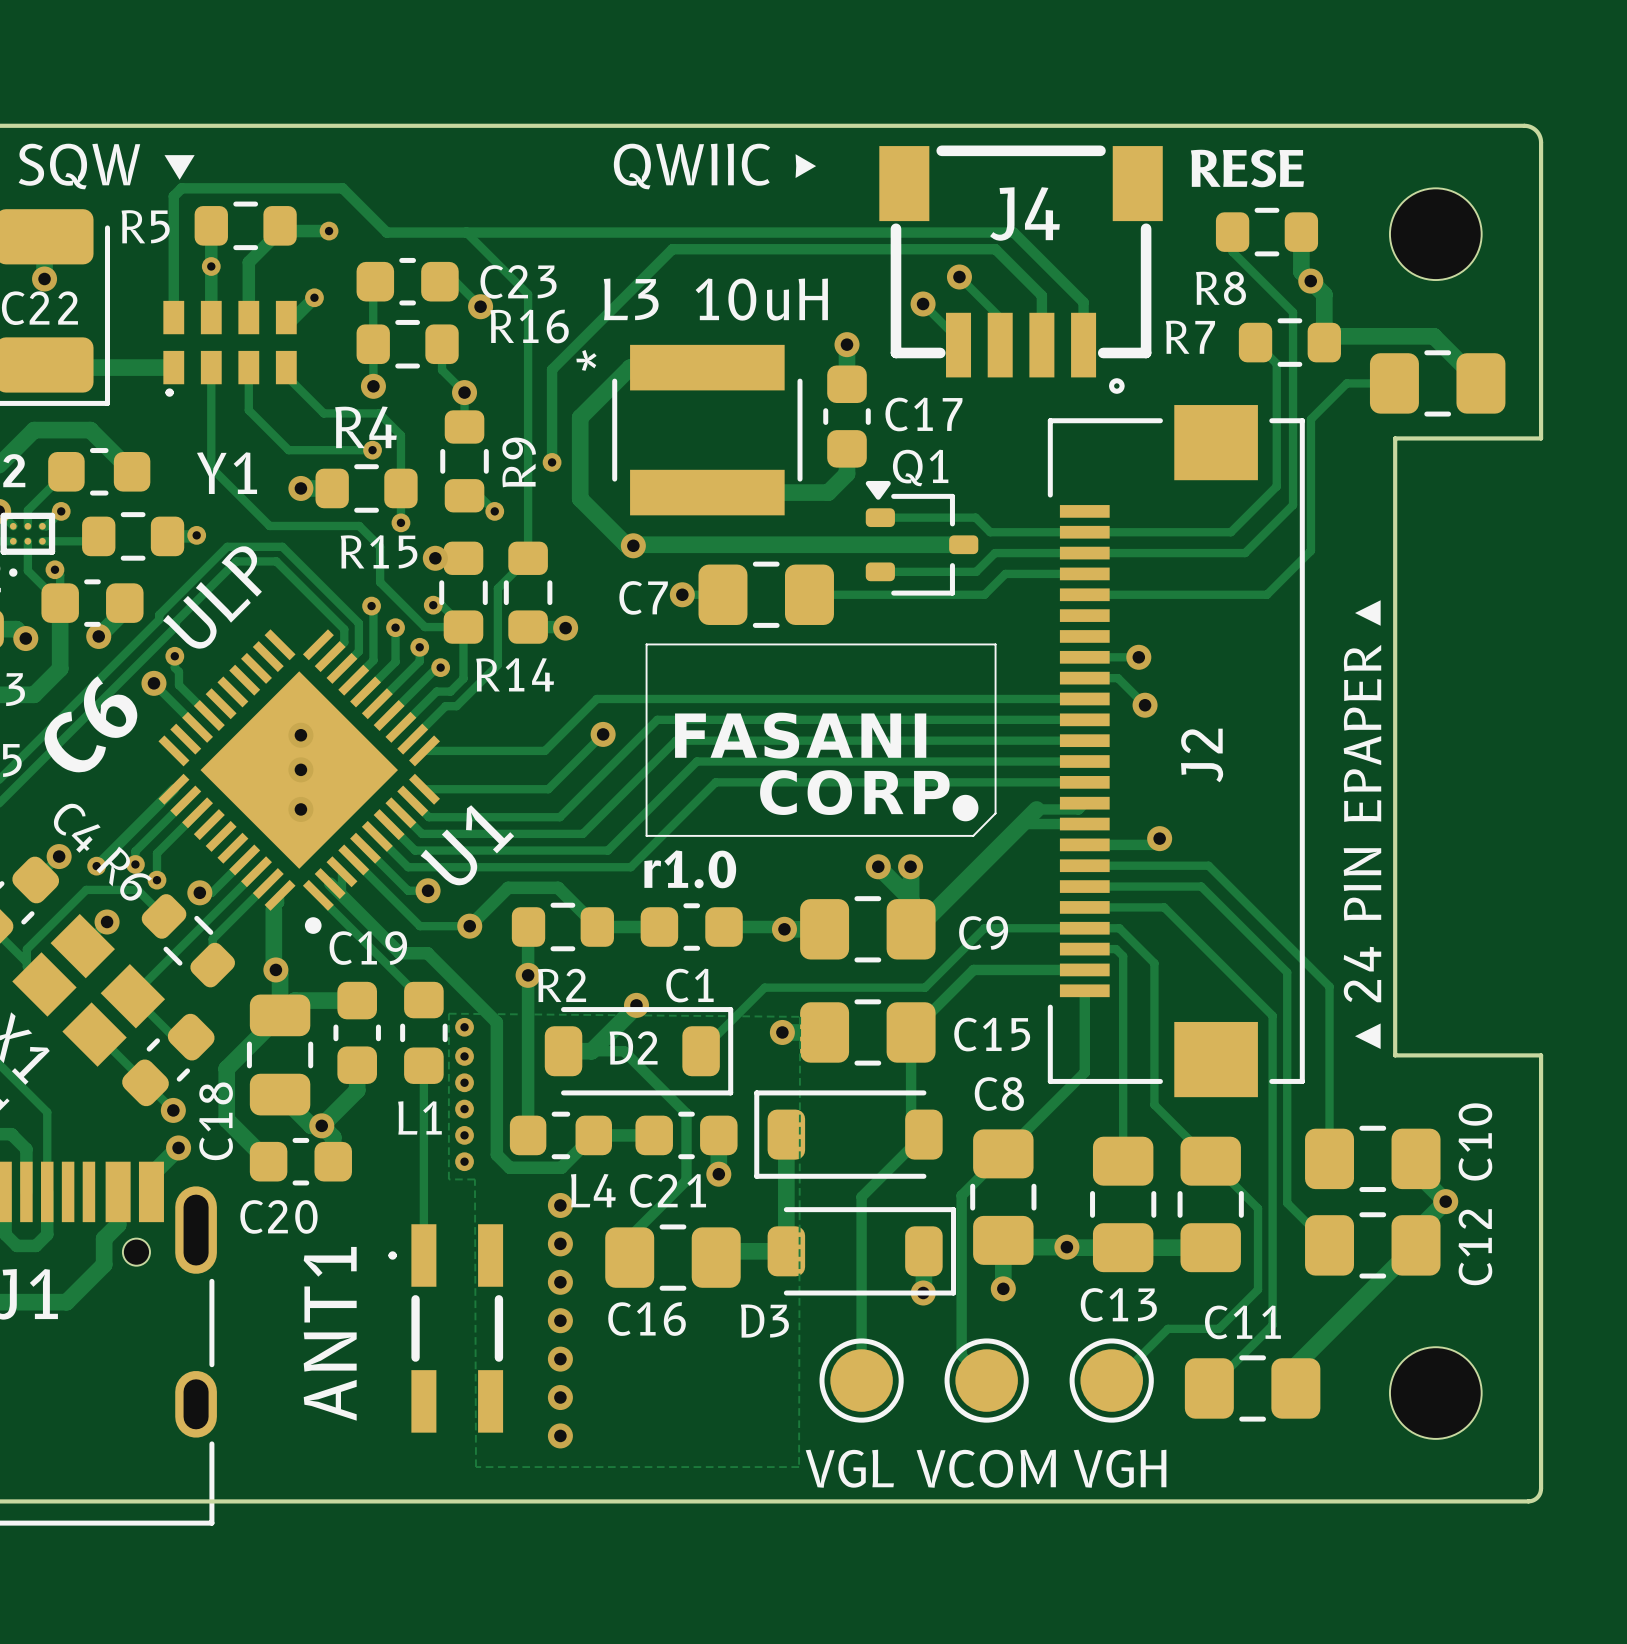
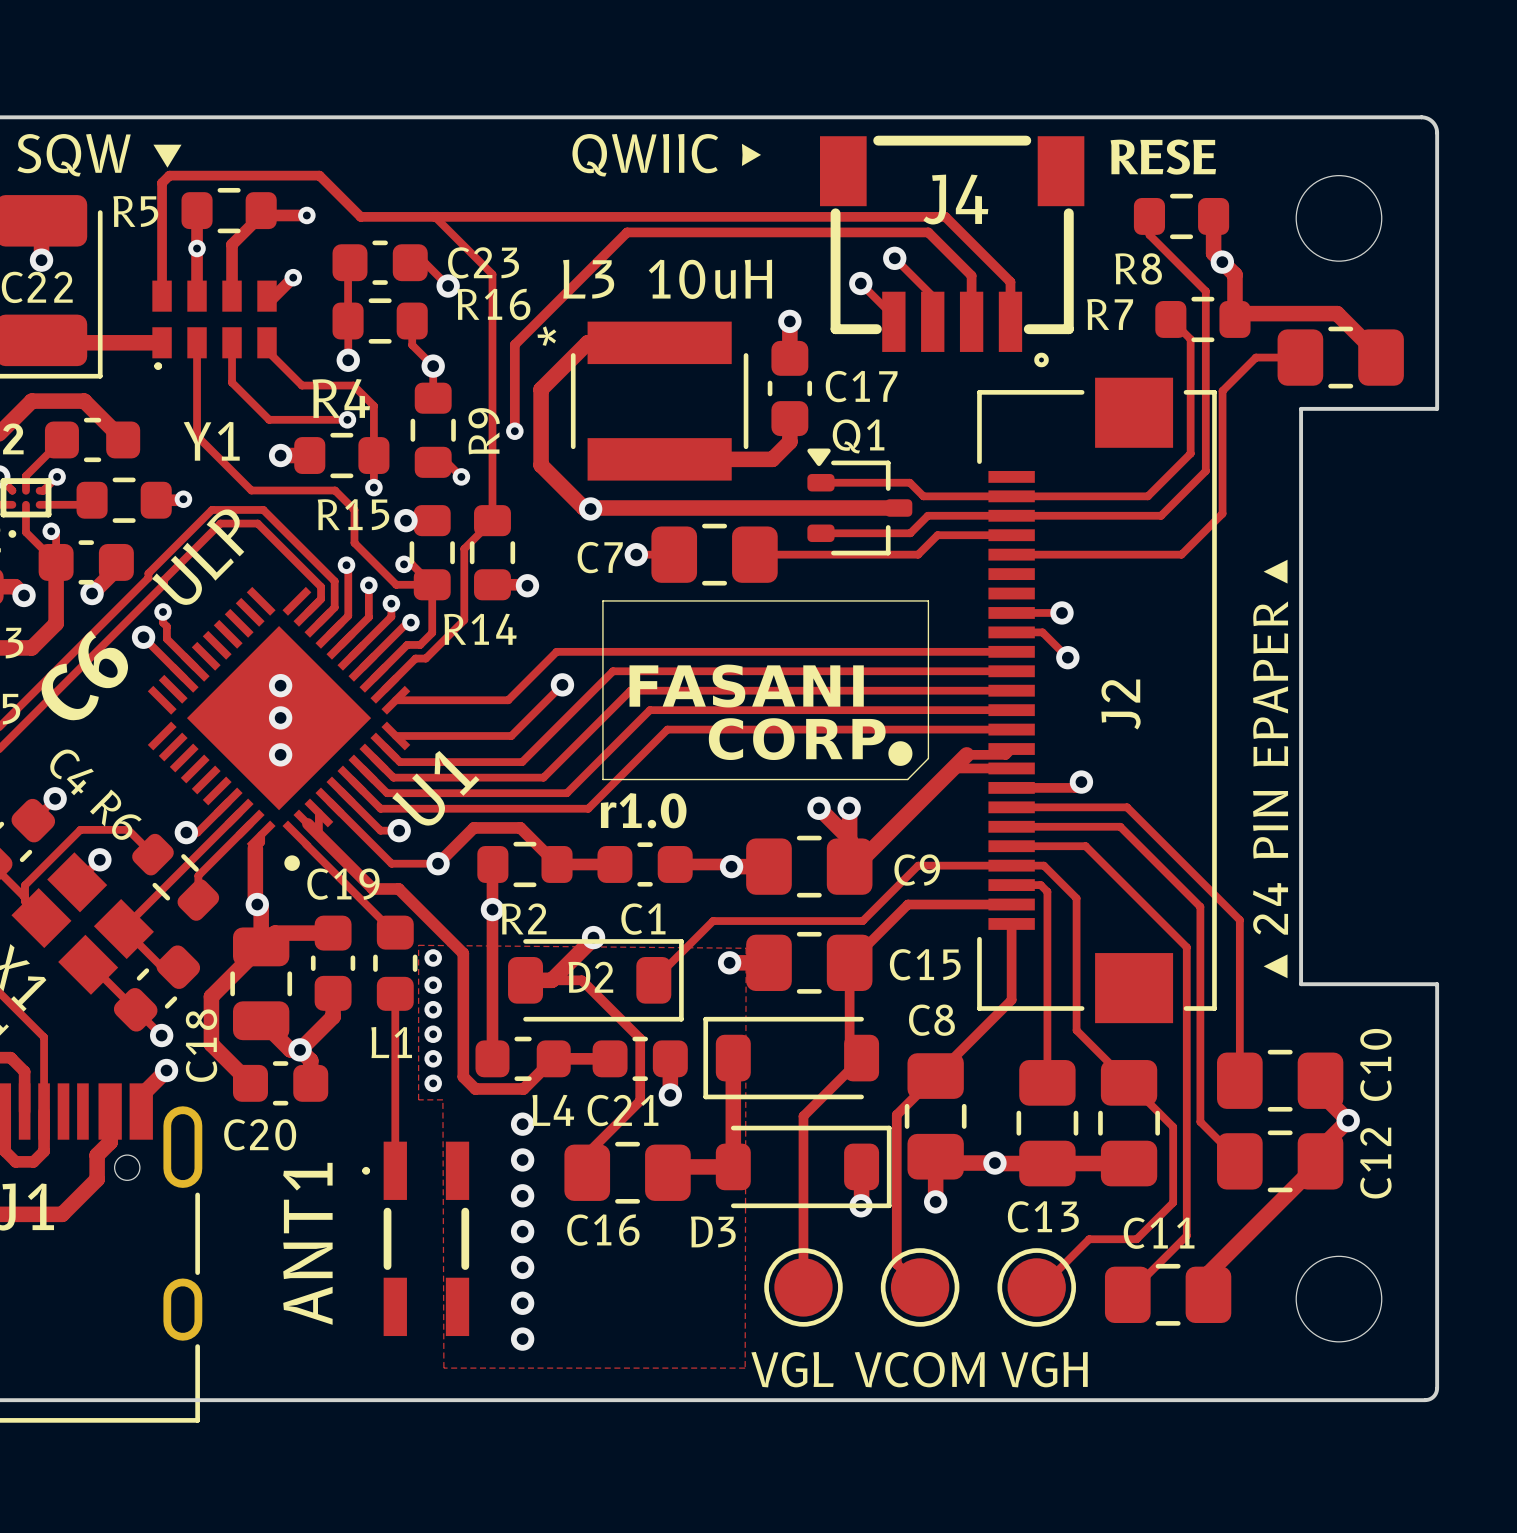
track: (173, 789) (97, 866) -> none
track: (185, 801) (135, 851) (135, 864) -> none
track: (197, 812) (156, 853) (156, 880) -> none
via: (135, 864) -> none
via: (96, 866) -> none
via: (156, 880) -> none

